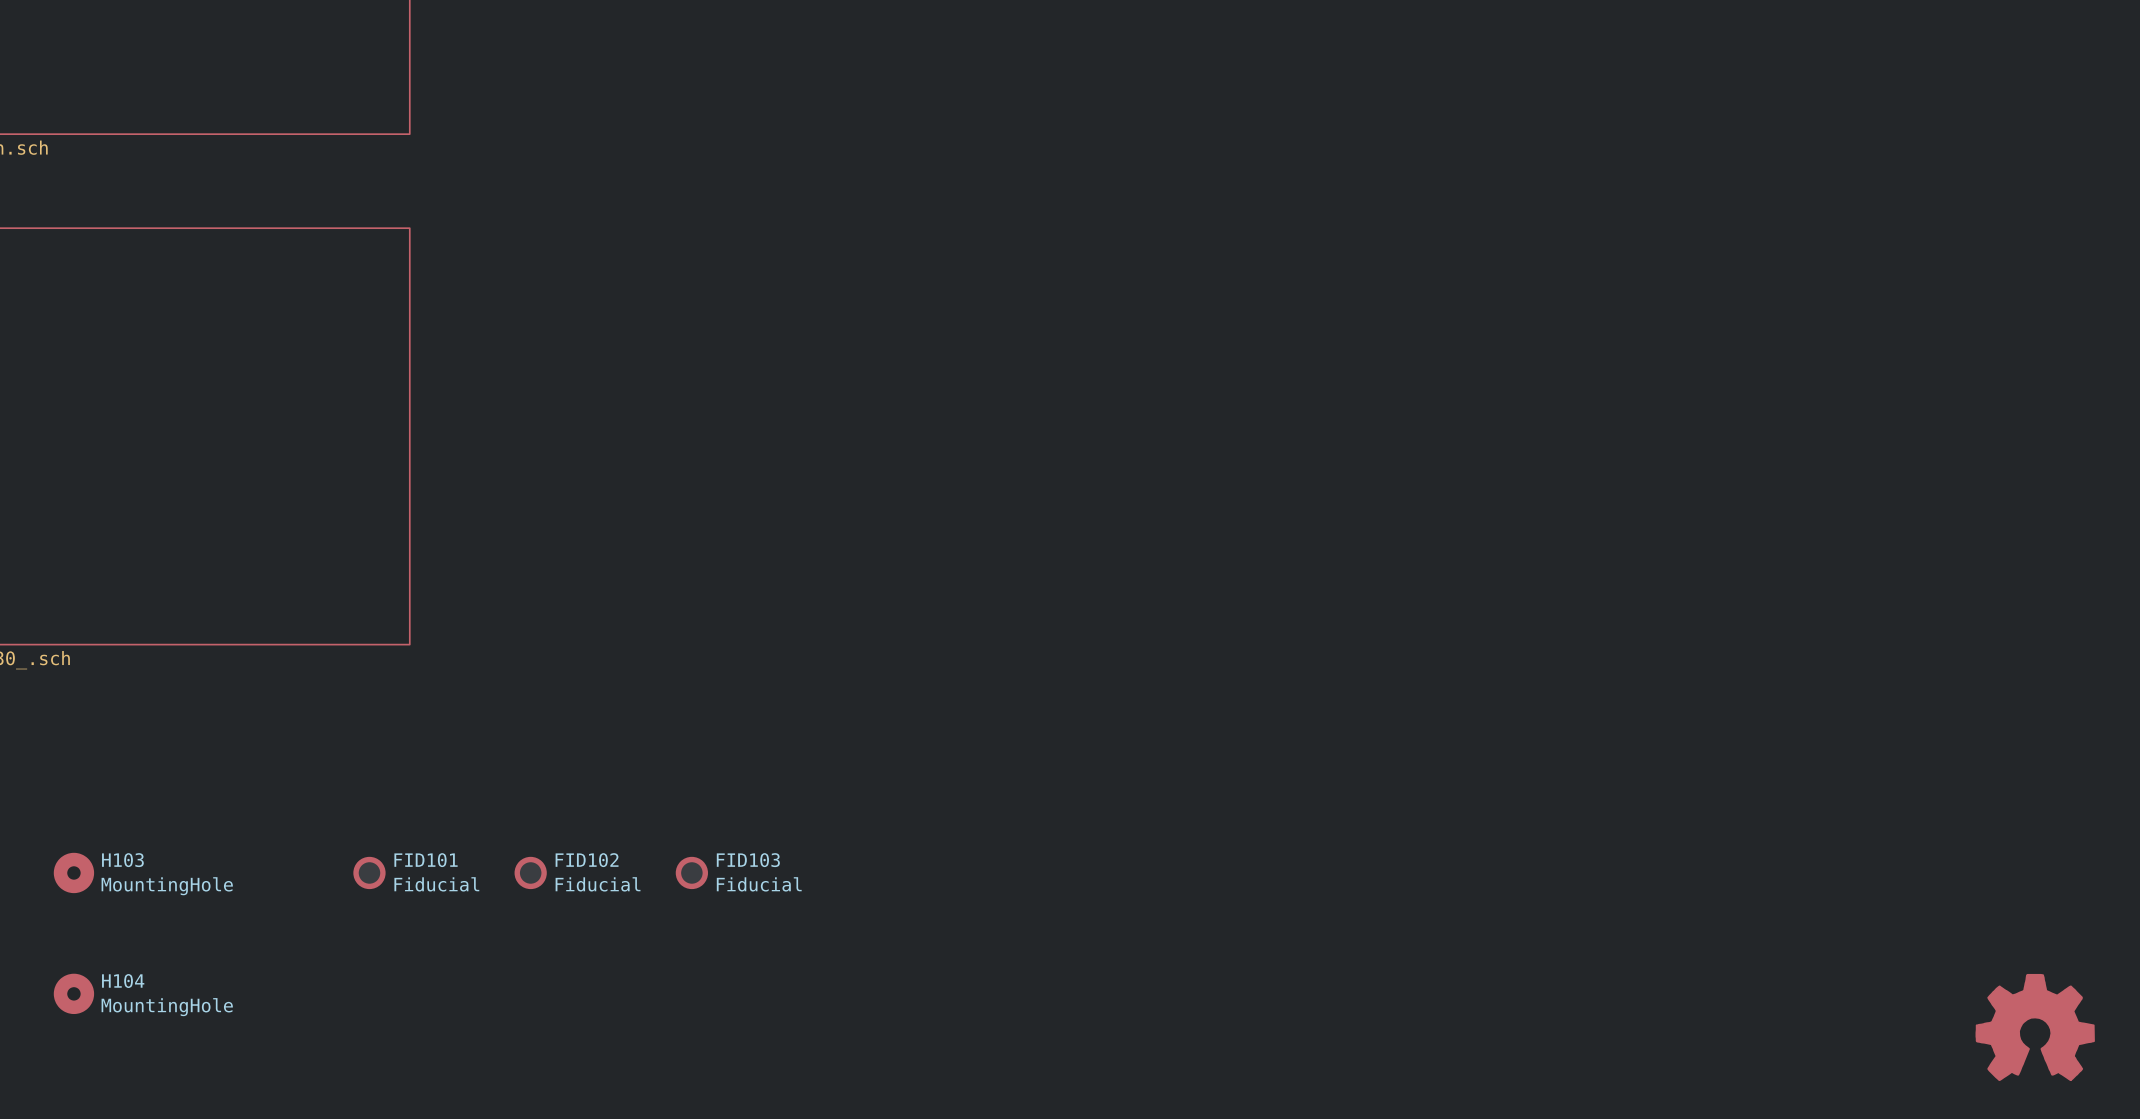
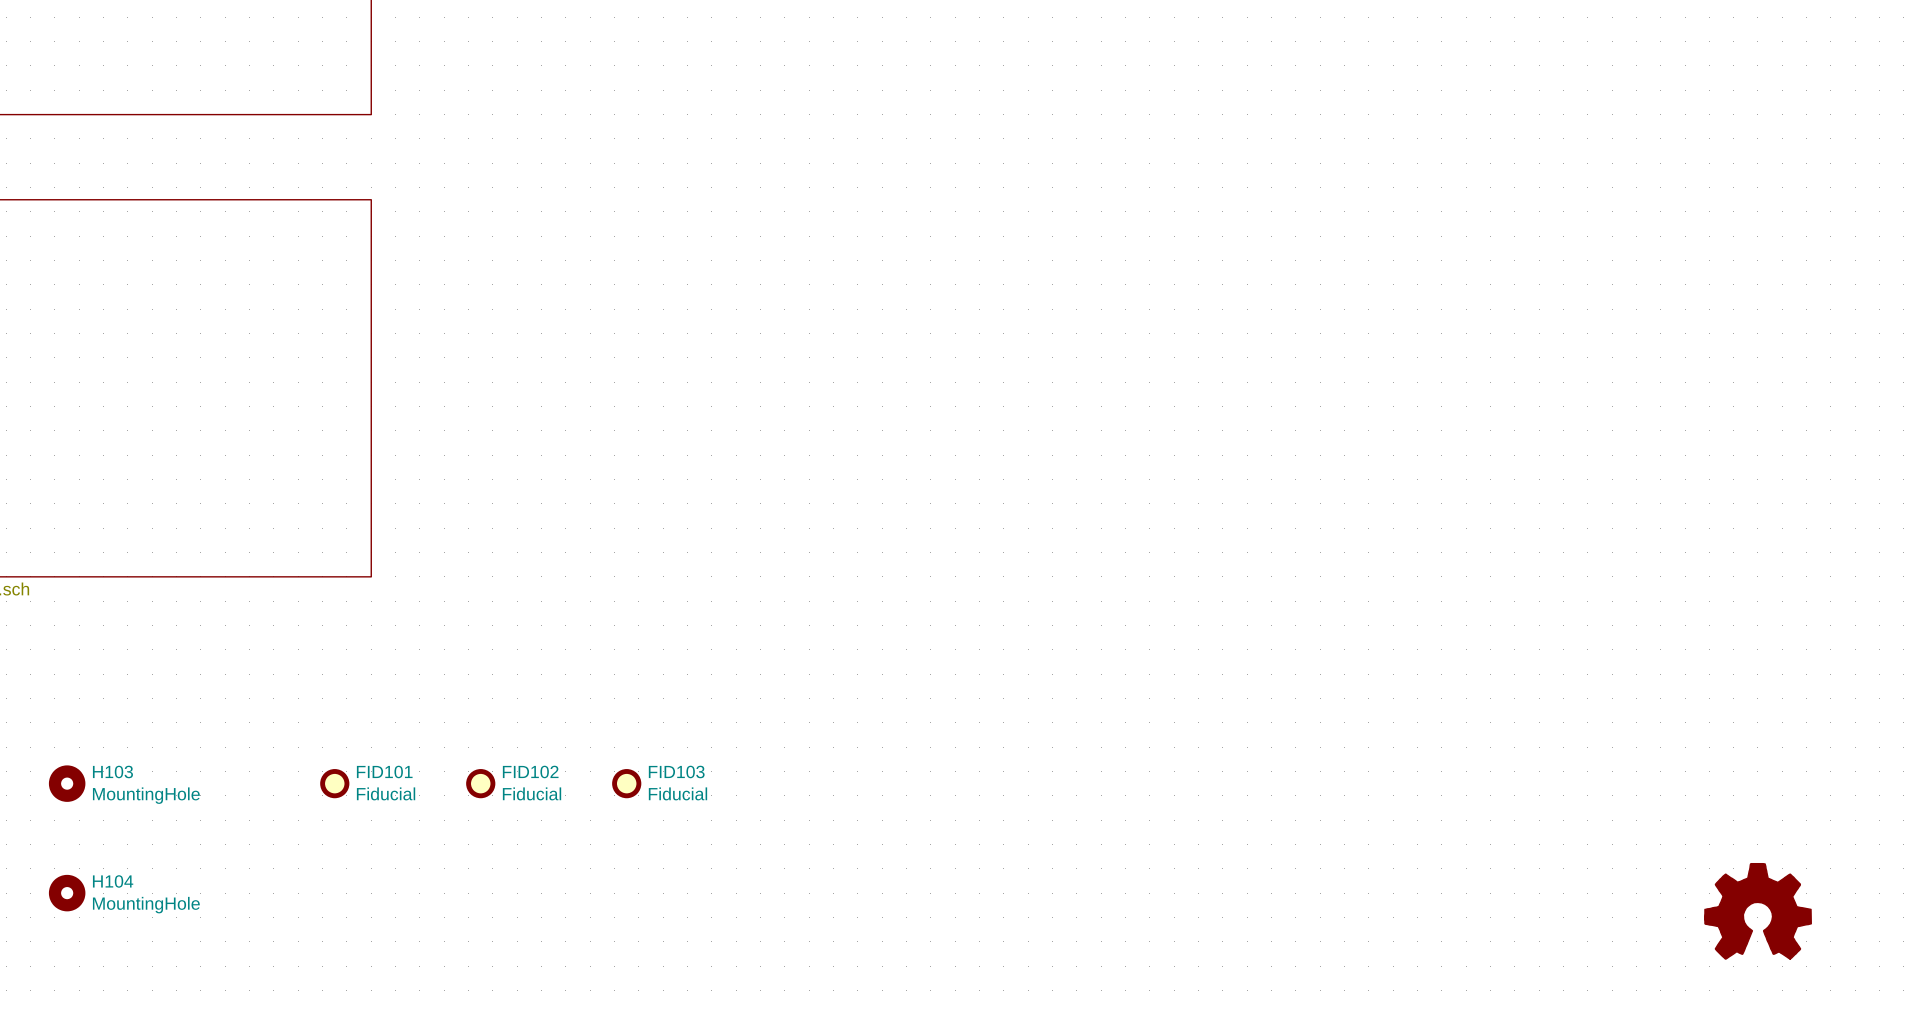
part position: (2035, 1027) -> (1757, 911)

